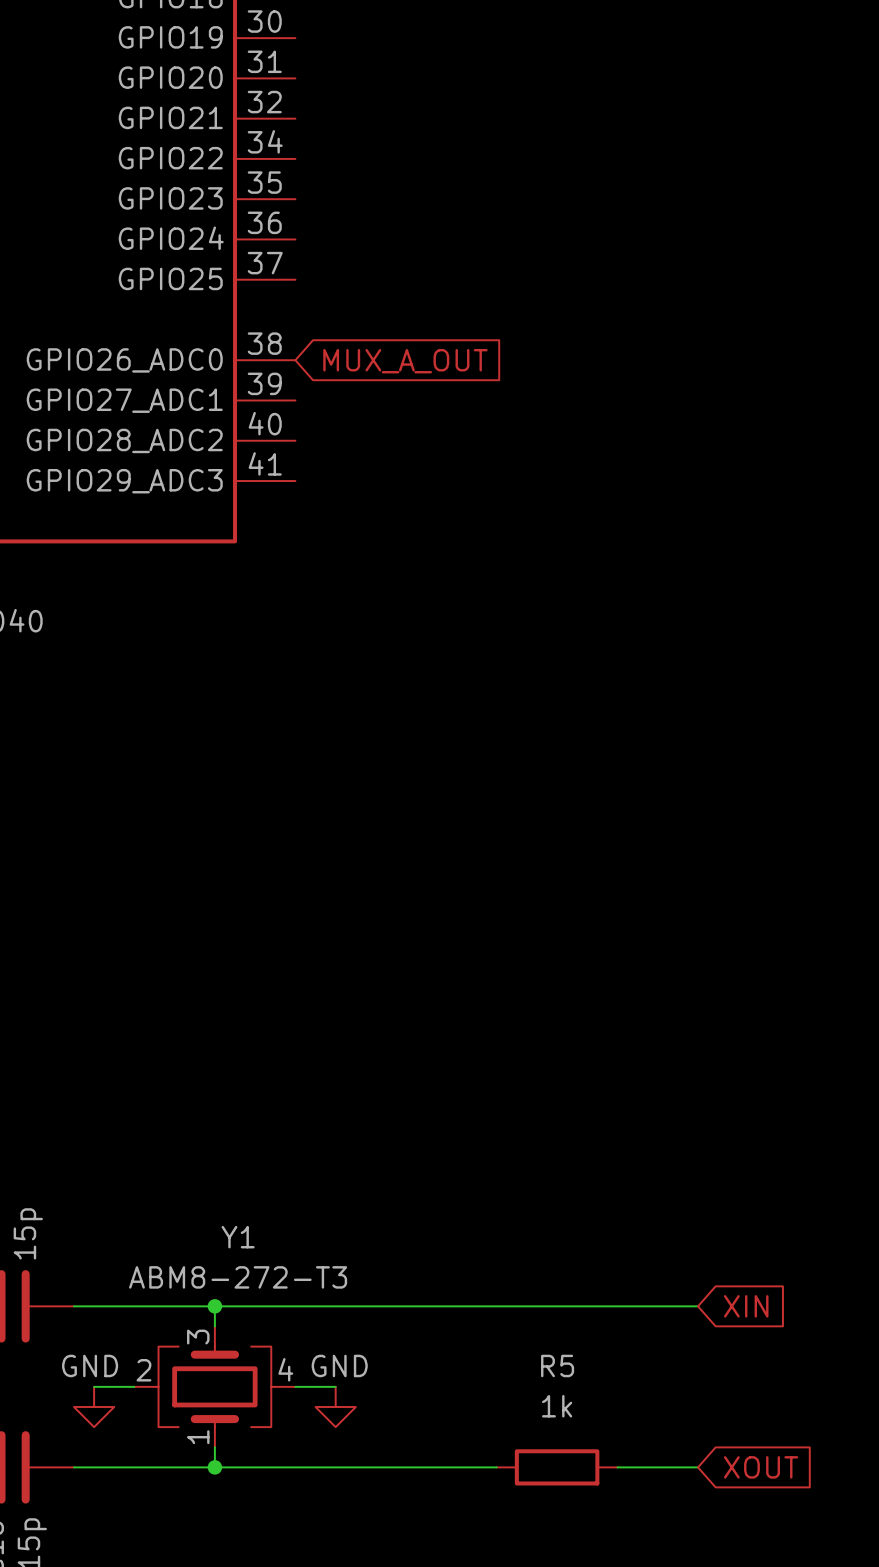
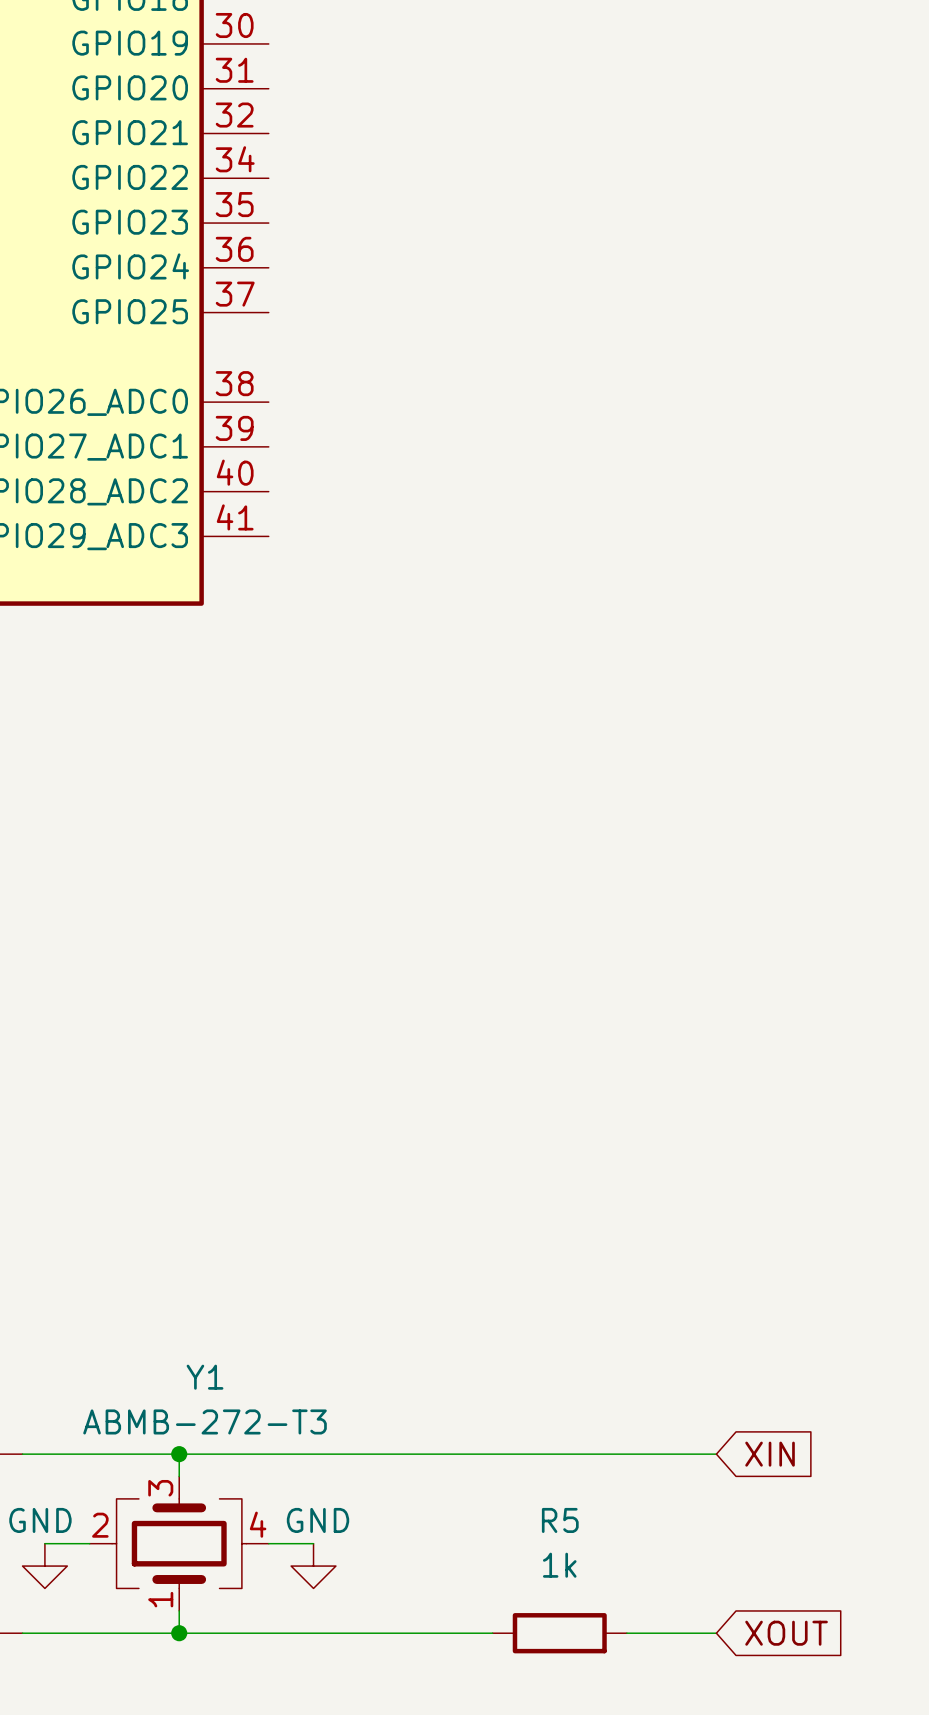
global label: MUX_A_OUT (405, 361) -> none
Y1 value: ABM8-272-T3 (238, 1277) -> ABMB-272-T3 (205, 1421)

